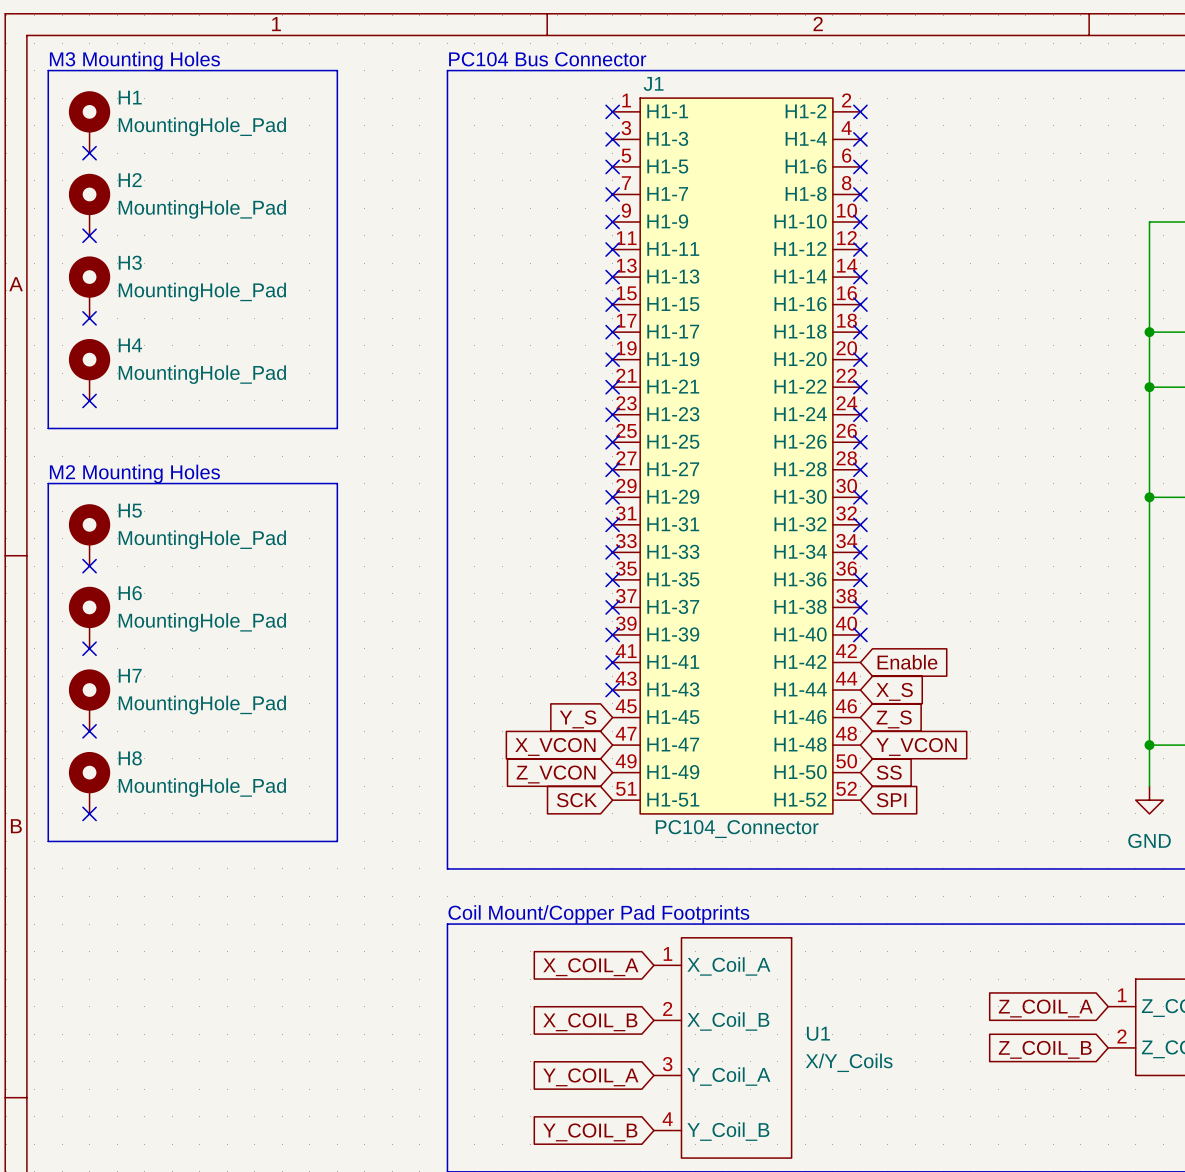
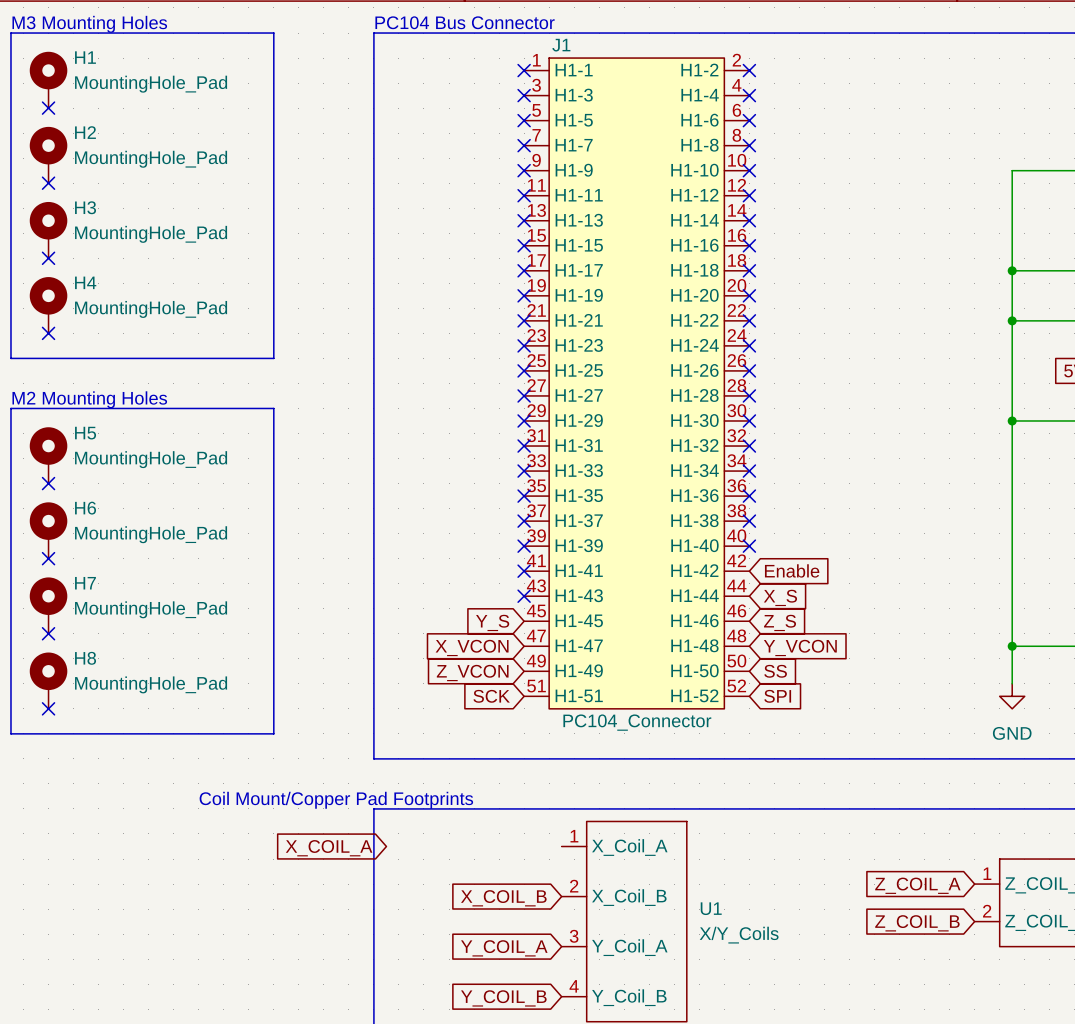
text position: Coil Mount/Copper Pad Footprints (598, 914) -> Coil Mount/Copper Pad Footprints (336, 800)
global label position: X_COIL_A (590, 967) -> X_COIL_A (329, 848)

